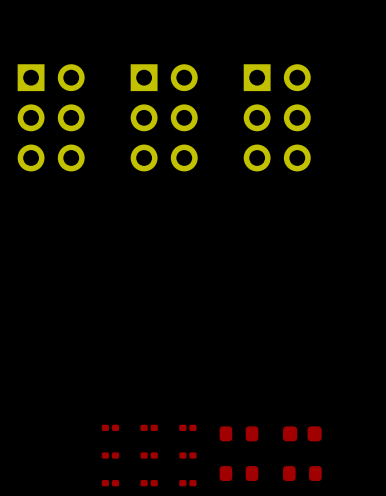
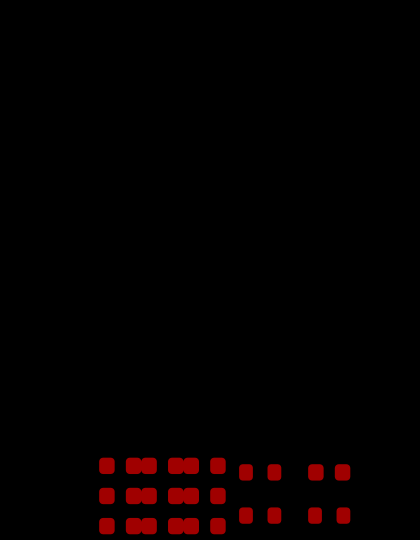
part: (51, 117) -> none
part: (164, 117) -> none
part: (277, 117) -> none
part footprint: [101, 424, 120, 432] -> [99, 457, 142, 475]
part footprint: [140, 424, 158, 432] -> [141, 457, 184, 475]
part footprint: [179, 424, 197, 432] -> [183, 457, 226, 475]
part footprint: [101, 452, 120, 459] -> [99, 487, 142, 505]
part footprint: [140, 452, 158, 459] -> [141, 487, 184, 505]
part footprint: [179, 452, 197, 459] -> [183, 487, 226, 505]
part footprint: [101, 480, 120, 487] -> [99, 517, 142, 535]
part footprint: [140, 480, 158, 487] -> [141, 517, 184, 535]
part footprint: [179, 480, 197, 487] -> [183, 517, 226, 535]

